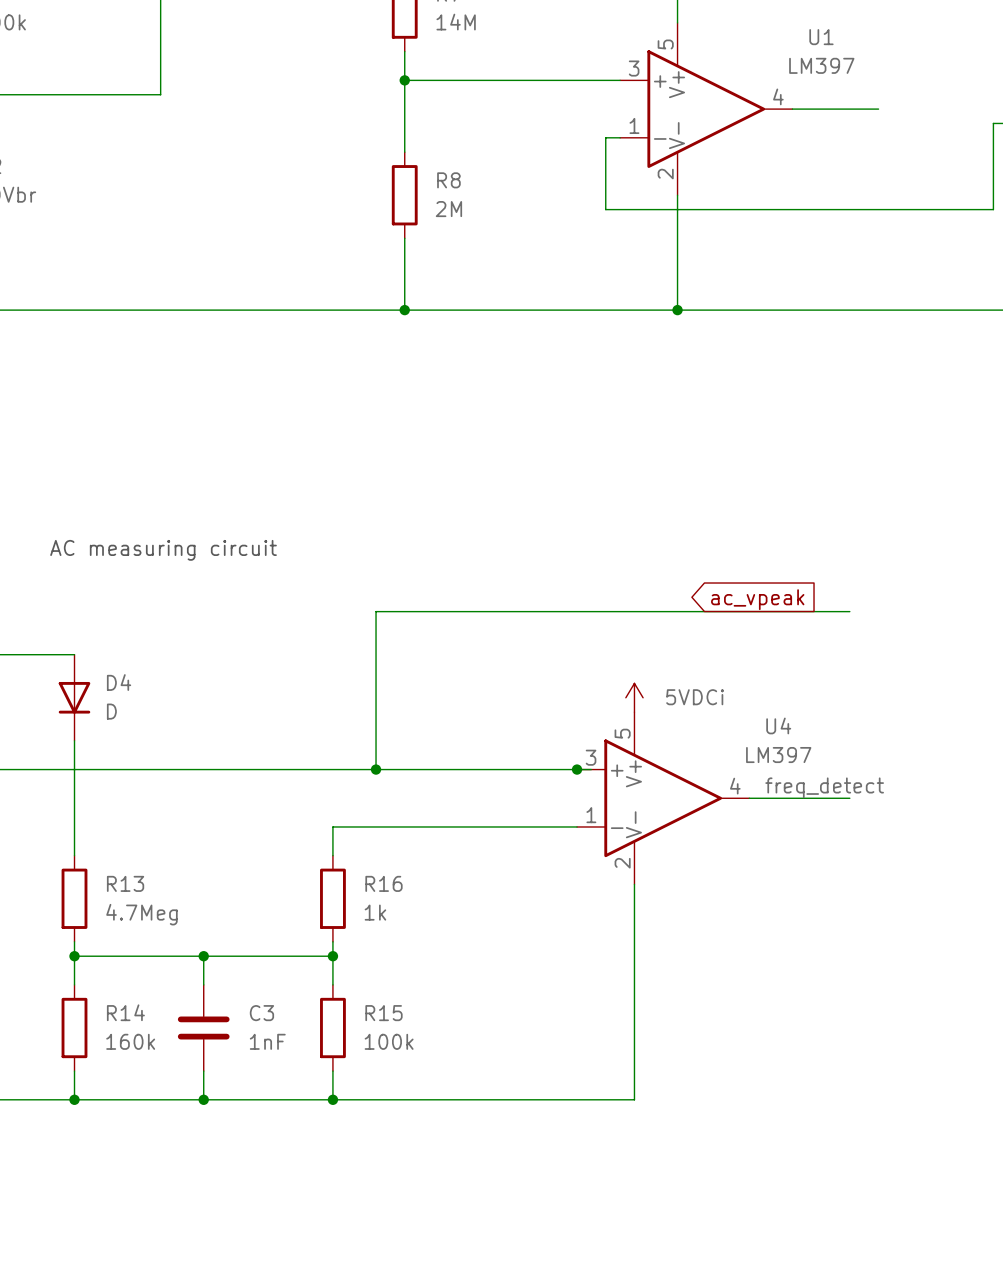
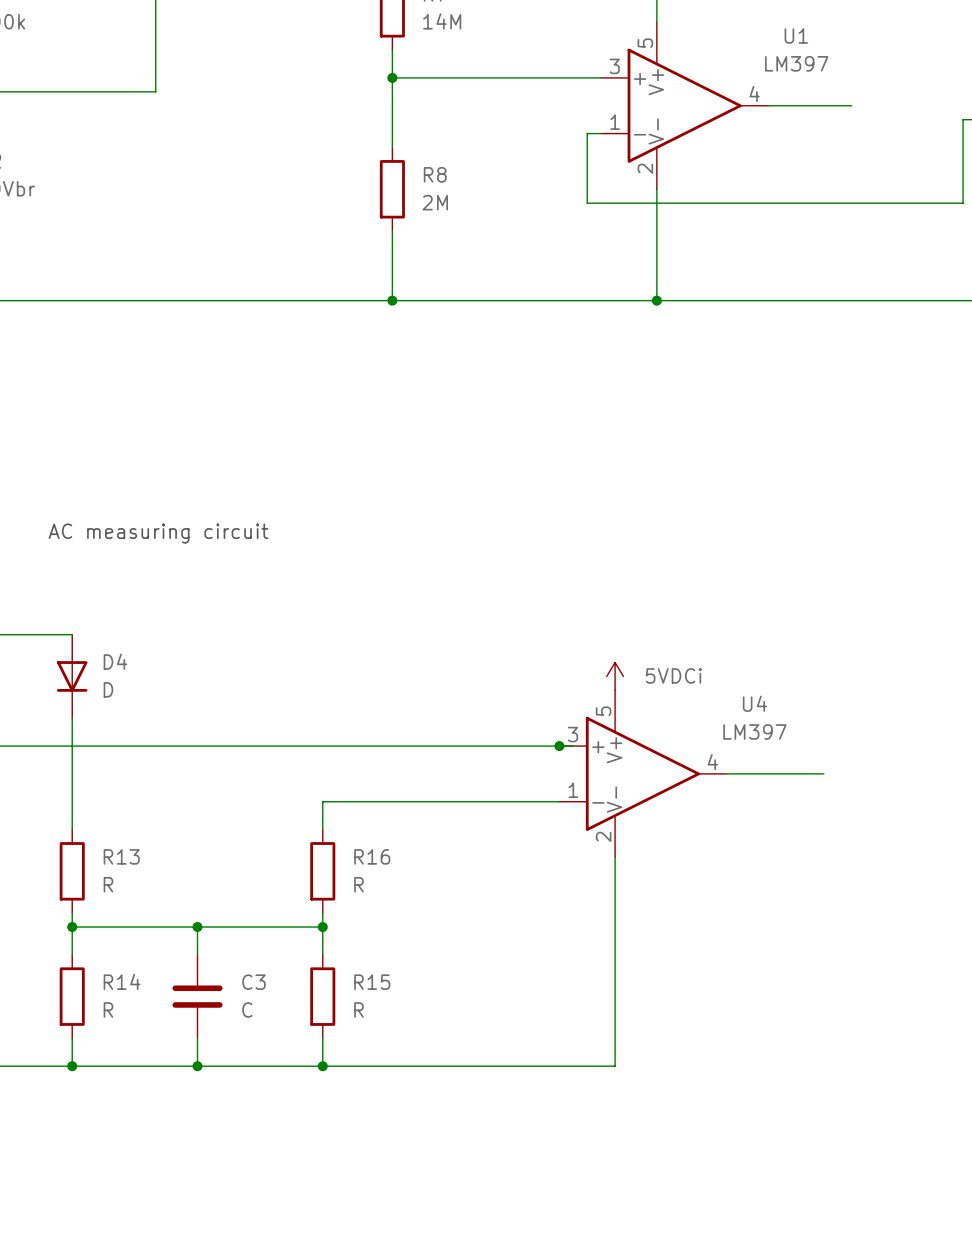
global label: ac_vpeak (757, 599) -> none
wire: (849, 611) (376, 611) (376, 769) -> none
junction: (376, 769) -> none
label: freq_detect (824, 787) -> none
R16 value: 1k (375, 912) -> R (359, 884)
R13 value: 4.7Meg (141, 914) -> R (108, 884)
R14 value: 160k (130, 1041) -> R (108, 1010)
C3 value: 1nF (267, 1041) -> C (247, 1010)
R15 value: 100k (389, 1041) -> R (359, 1010)

